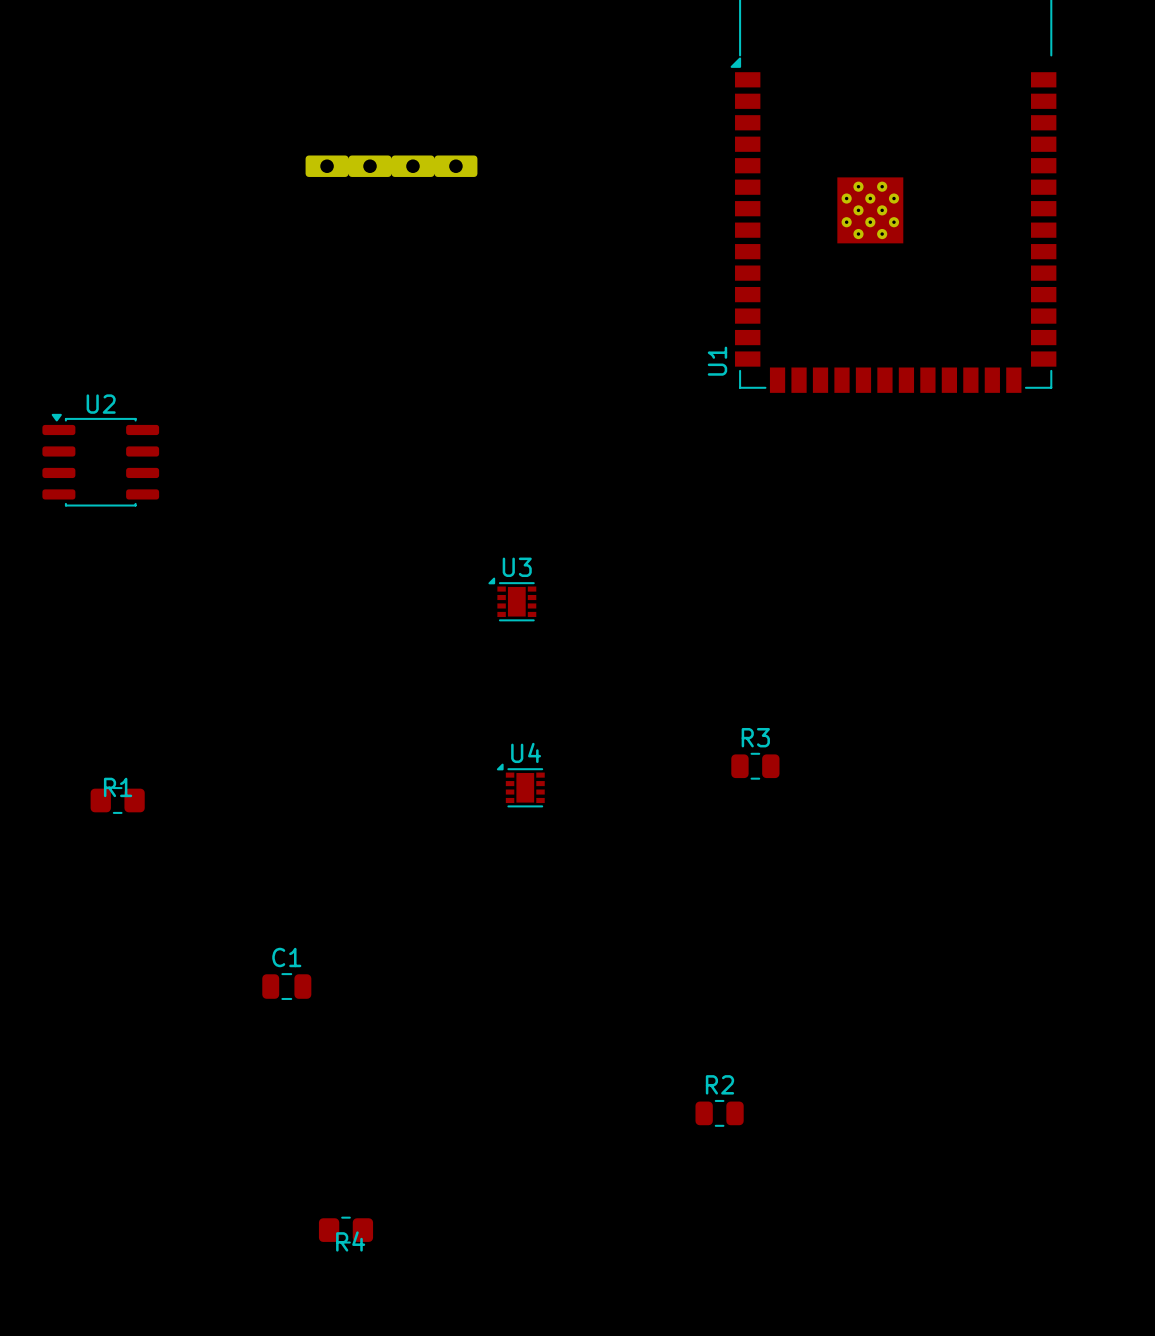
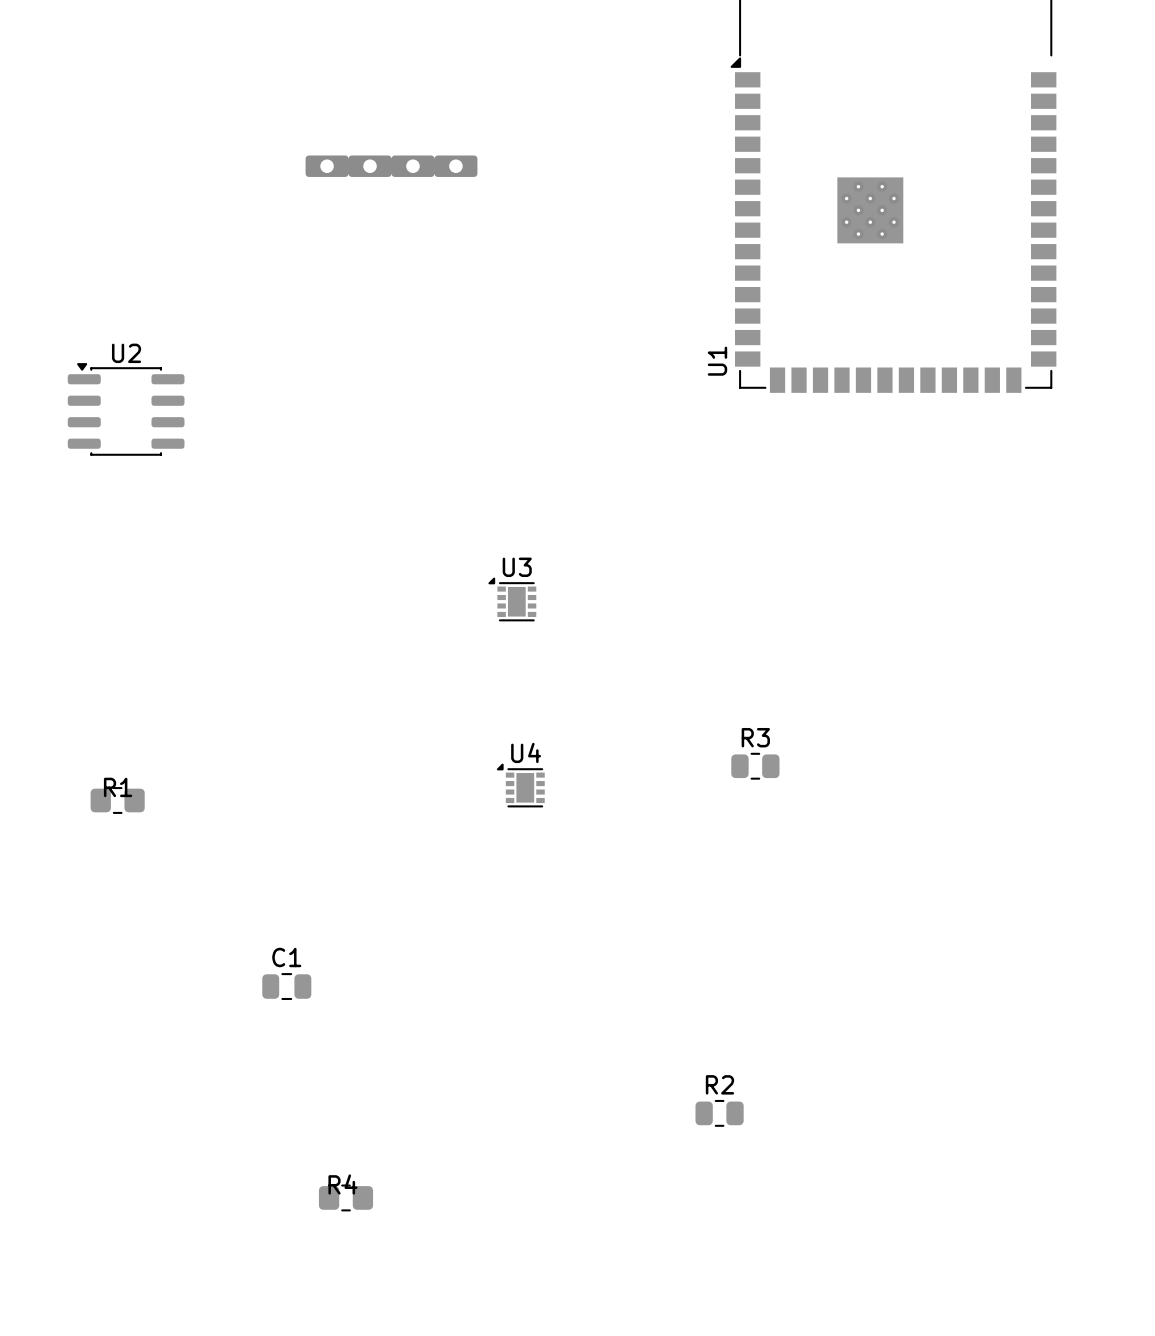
U2 position: (100, 460) -> (126, 409)
R4 position: (346, 1230) -> (346, 1197)
R4 name position: R4 (350, 1241) -> R4 (342, 1184)

